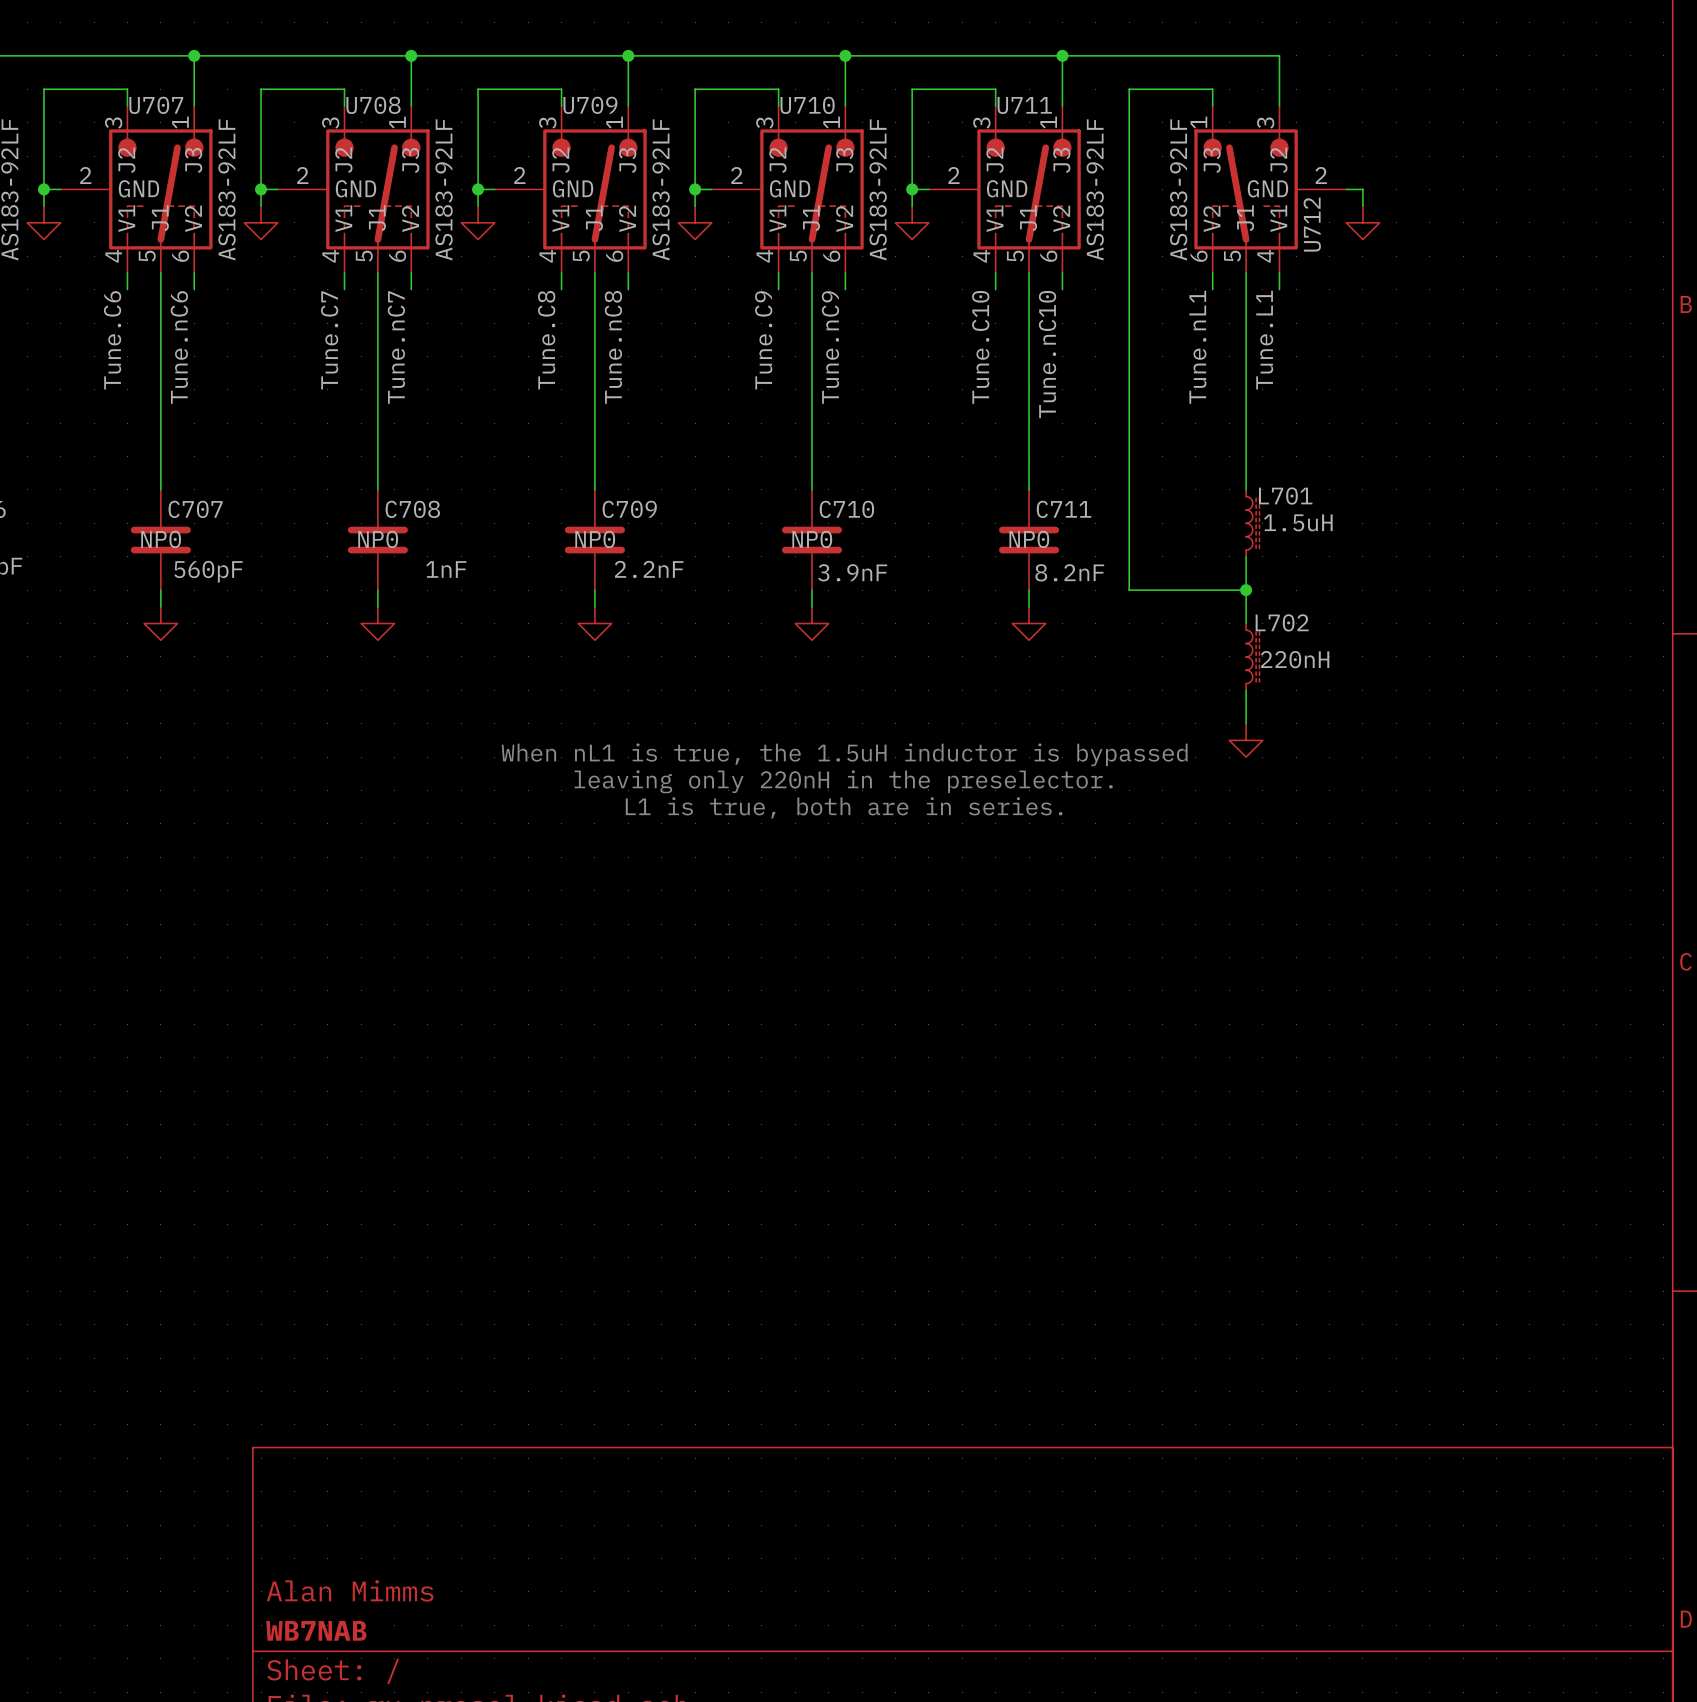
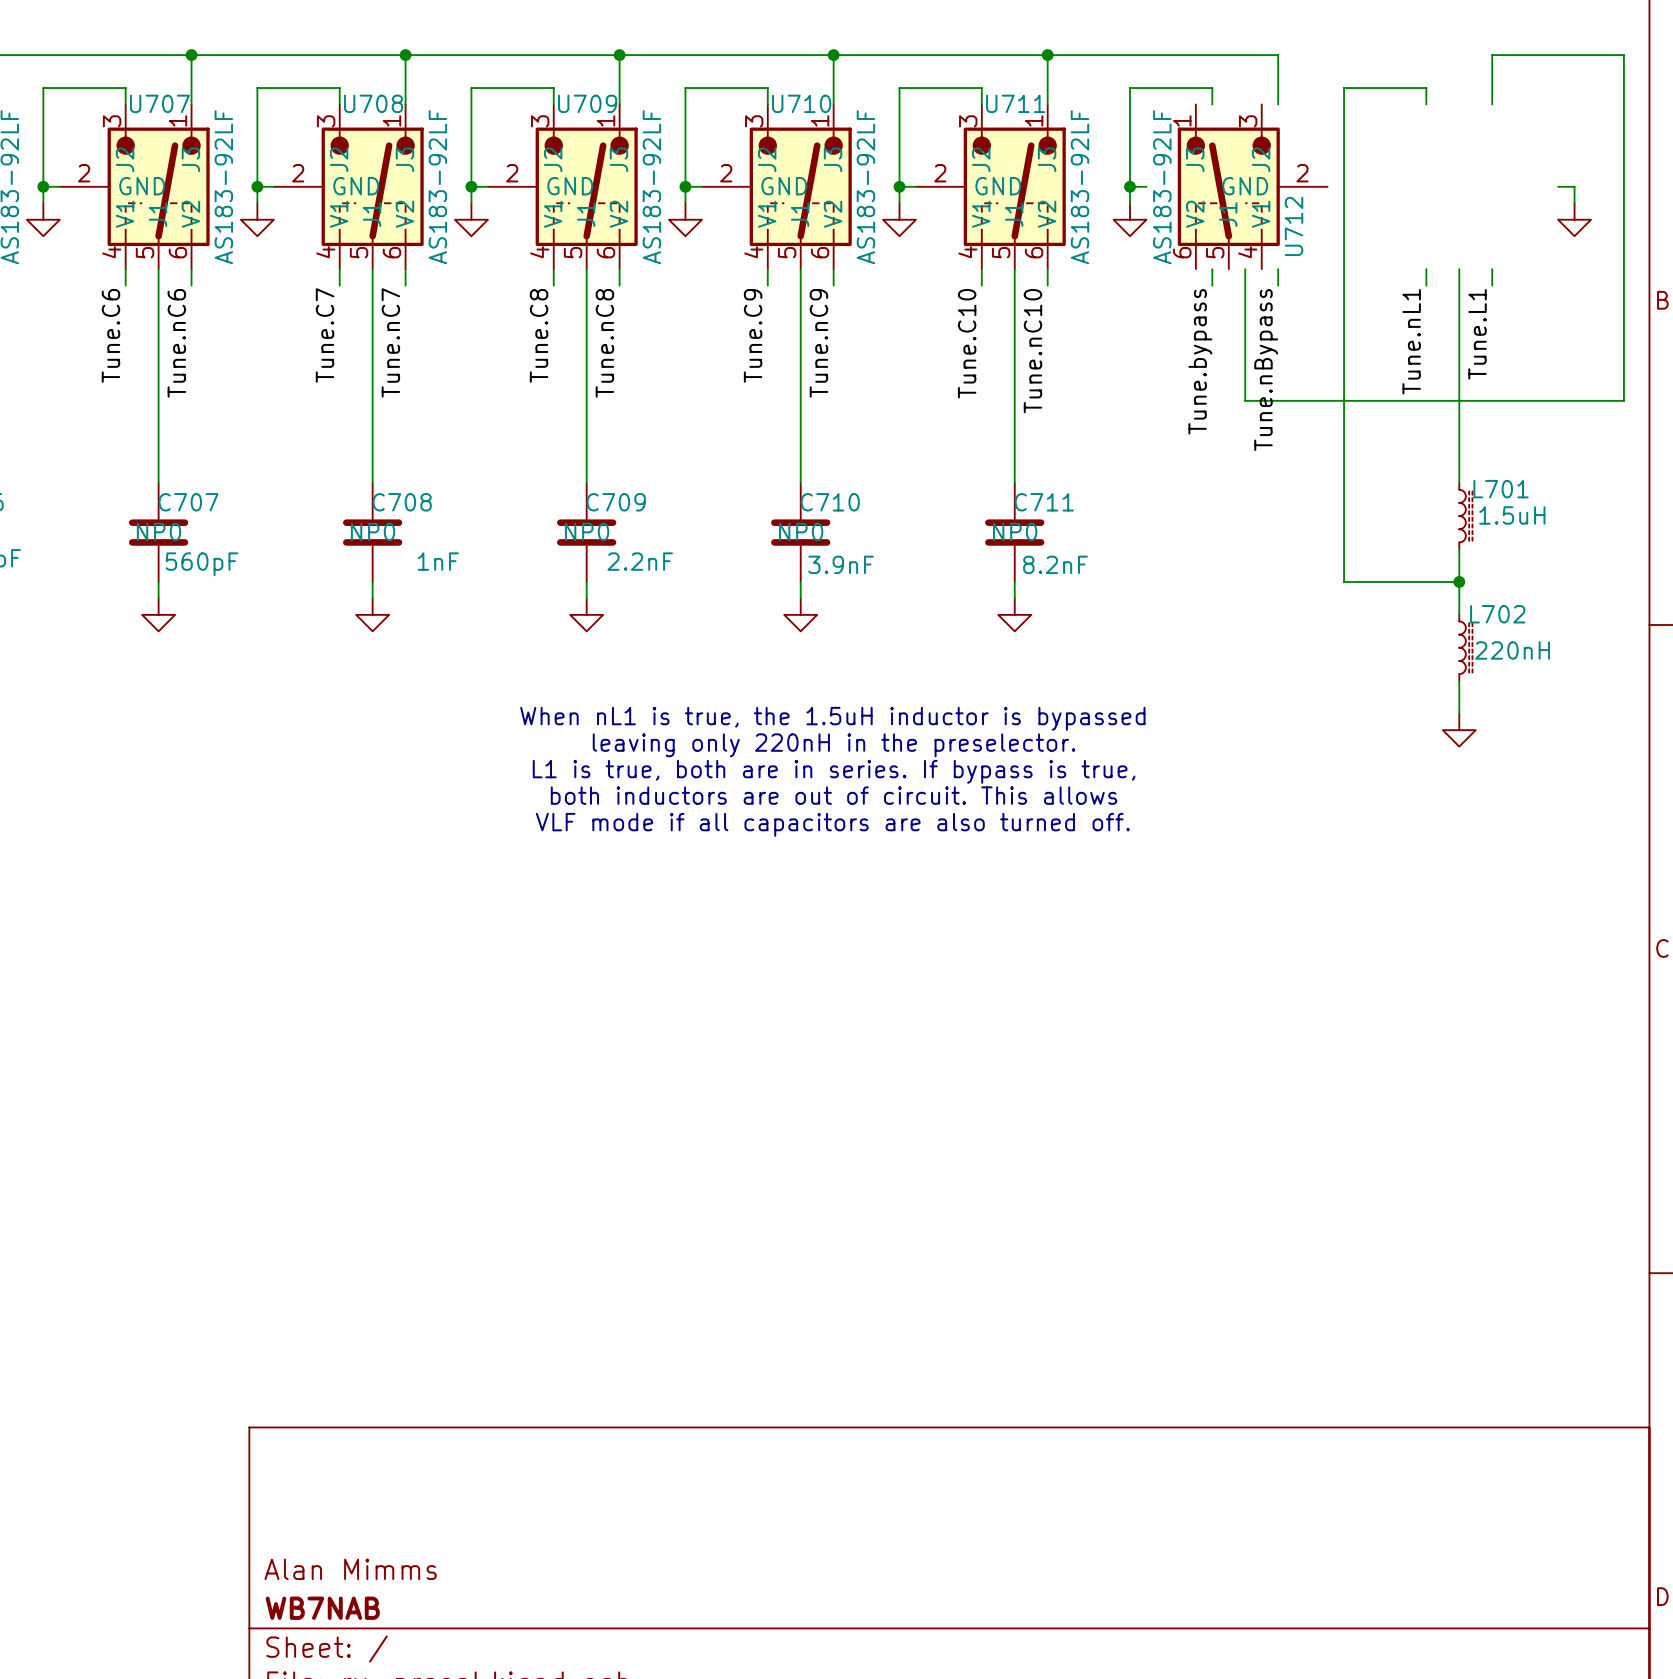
wire: (1279, 55) (1279, 105) -> (1261, 55) (1278, 55) (1278, 104)
wire: (1145, 89) (1129, 89) (1129, 590) (1246, 590) -> (1130, 88) (1130, 203)
wire: (1212, 89) (1212, 105) -> (1195, 88) (1212, 88) (1212, 104)
wire: none -> (1492, 104) (1492, 55) (1623, 55) (1623, 400) (1245, 400) (1245, 269)
wire: none -> (1130, 186) (1146, 186)
junction: none -> (1130, 186)
wire: (1346, 189) (1362, 189) -> (1426, 104) (1426, 88) (1344, 88) (1344, 186)
wire: none -> (1558, 186) (1574, 186) (1574, 203)
wire: none -> (1344, 203) (1344, 581) (1459, 581)
power symbol: none -> (1130, 219)
power symbol: (1362, 222) -> none
power symbol: none -> (1574, 219)
wire: (1212, 272) (1212, 289) -> (1426, 269) (1426, 285)
wire: none -> (1212, 269) (1212, 285)
wire: (1246, 272) (1246, 489) -> (1459, 269) (1459, 483)
wire: (1279, 272) (1279, 289) -> (1492, 269) (1492, 285)
wire: none -> (1278, 269) (1278, 285)
label position: Tune.L1 (1264, 340) -> Tune.L1 (1477, 334)
label position: Tune.nL1 (1197, 347) -> Tune.nL1 (1411, 341)
label: none -> Tune.bypass (1200, 361)
label: none -> Tune.nBypass (1266, 370)
L701 position: (1252, 523) -> (1465, 516)
wire: (1246, 556) (1246, 623) -> (1459, 549) (1459, 614)
junction: (1246, 590) -> none
junction: none -> (1459, 581)
L702 position: (1252, 656) -> (1465, 647)
wire: (1246, 690) (1246, 723) -> (1459, 680) (1459, 713)
text: none -> When nL1 is true, the 1.5uH inductor is bypassed (832, 718)
power symbol position: (1246, 740) -> (1459, 730)
text: When nL1 is true, the 1.5uH inductor is bypassed (844, 754) -> leaving only 220nH in the preselector. (834, 745)
text: leaving only 220nH in the preselector. (843, 781) -> L1 is true, both are in series. If bypass is true, (834, 771)
text: L1 is true, both are in series. (844, 807) -> both inductors are out of circuit. This allows (834, 795)
text: none -> VLF mode if all capacitors are also turned off. (832, 824)

